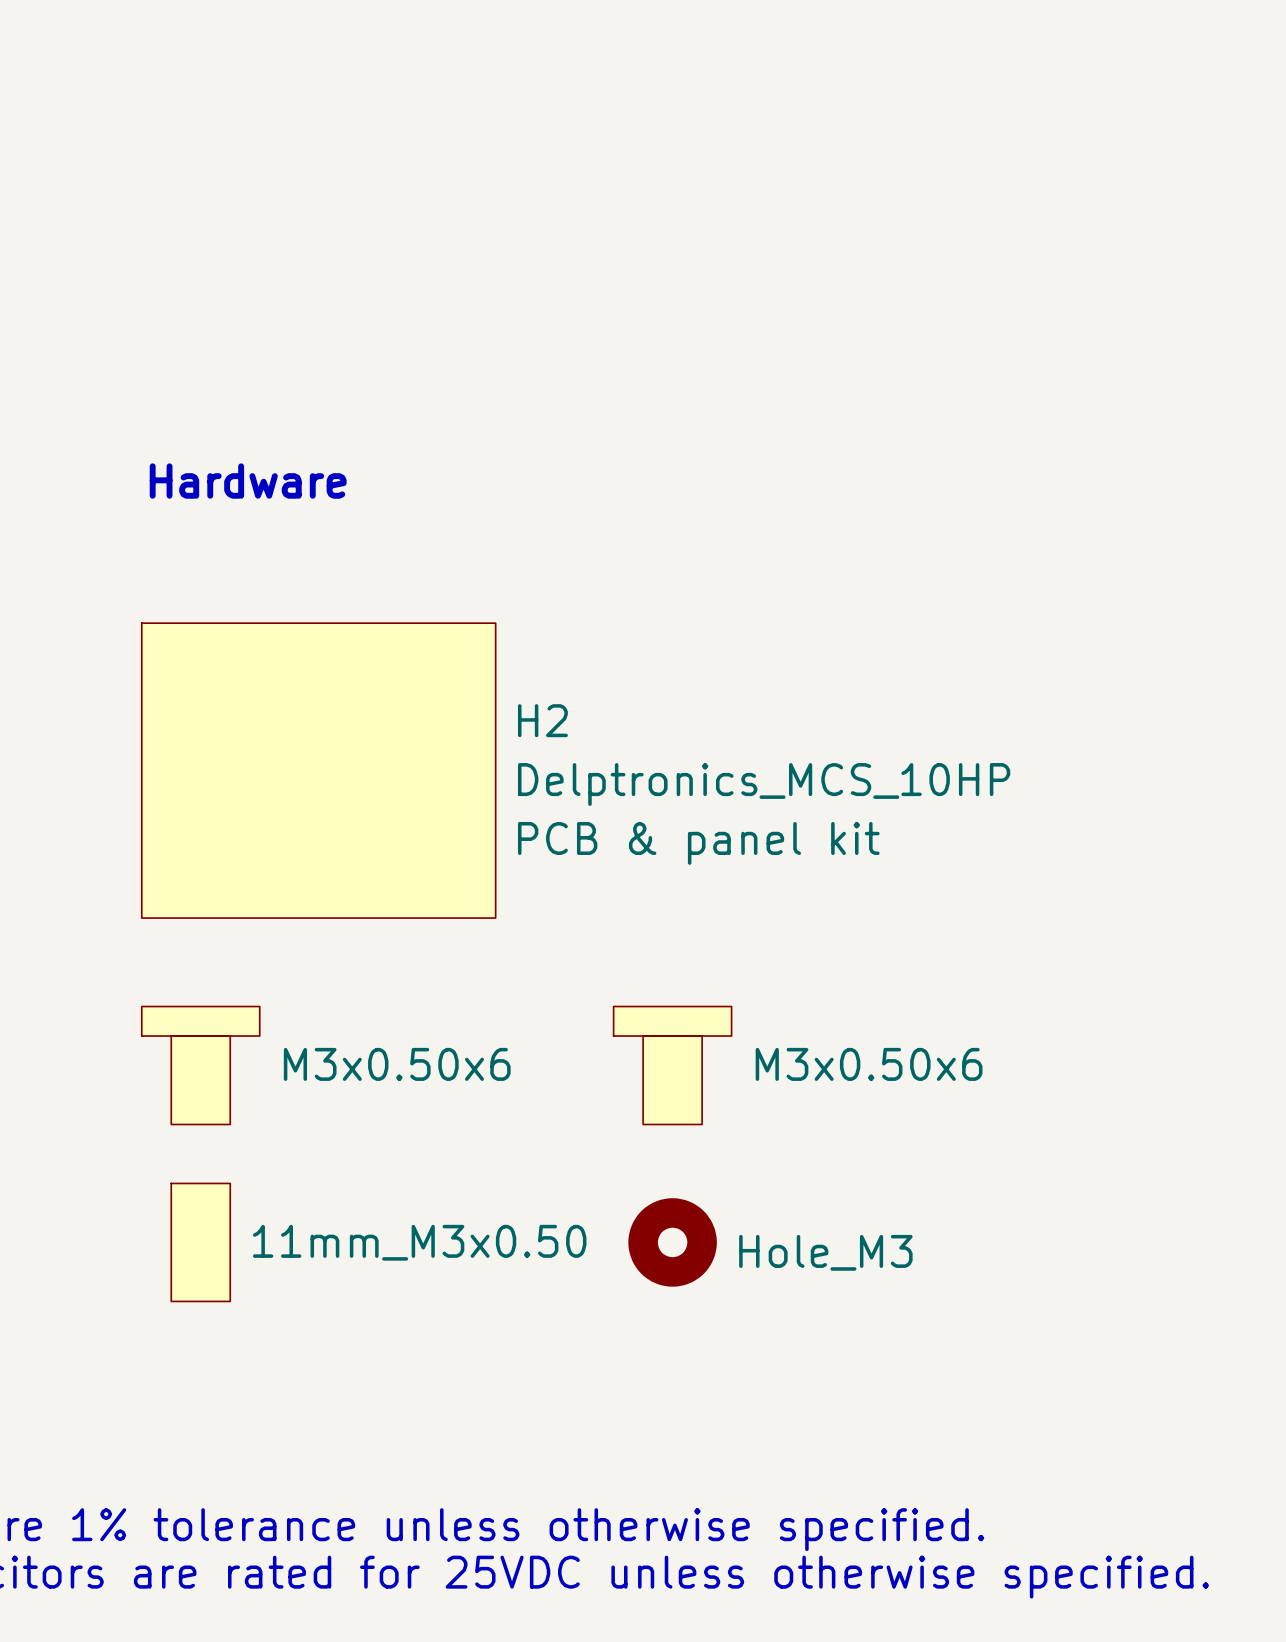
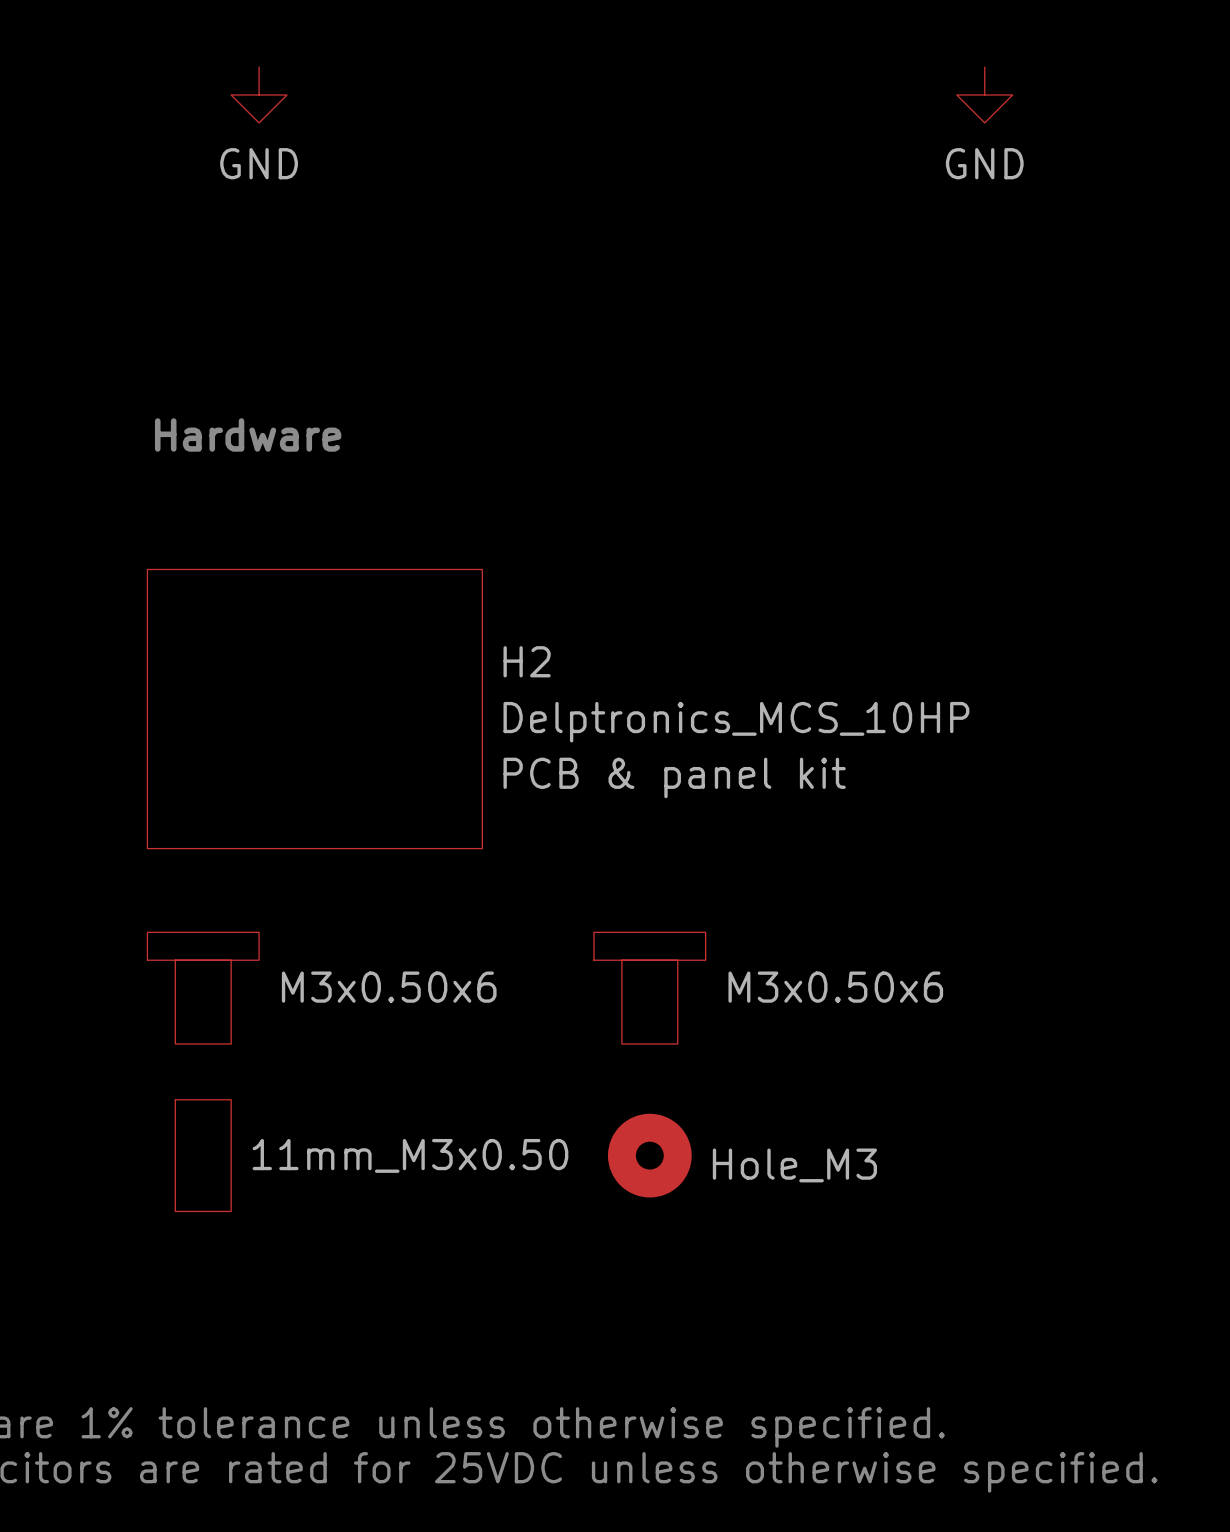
power symbol: none -> GND (259, 95)
power symbol: none -> GND (984, 95)

